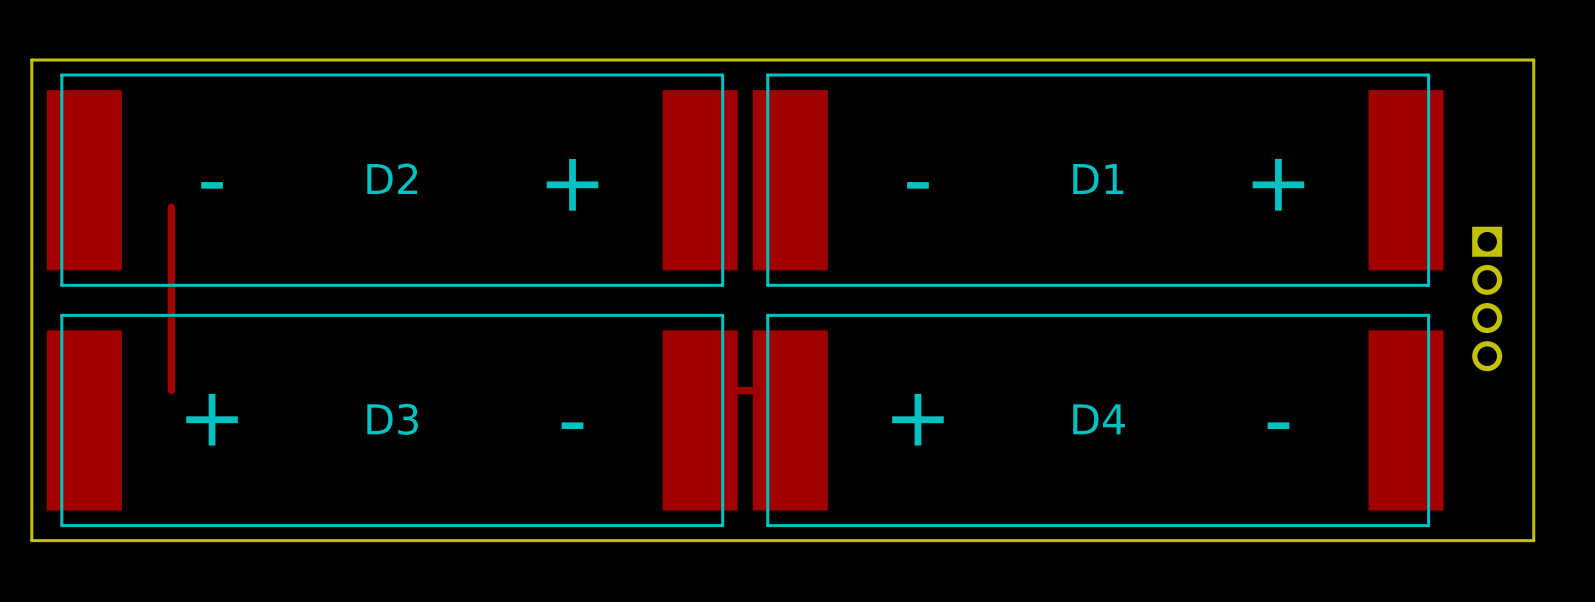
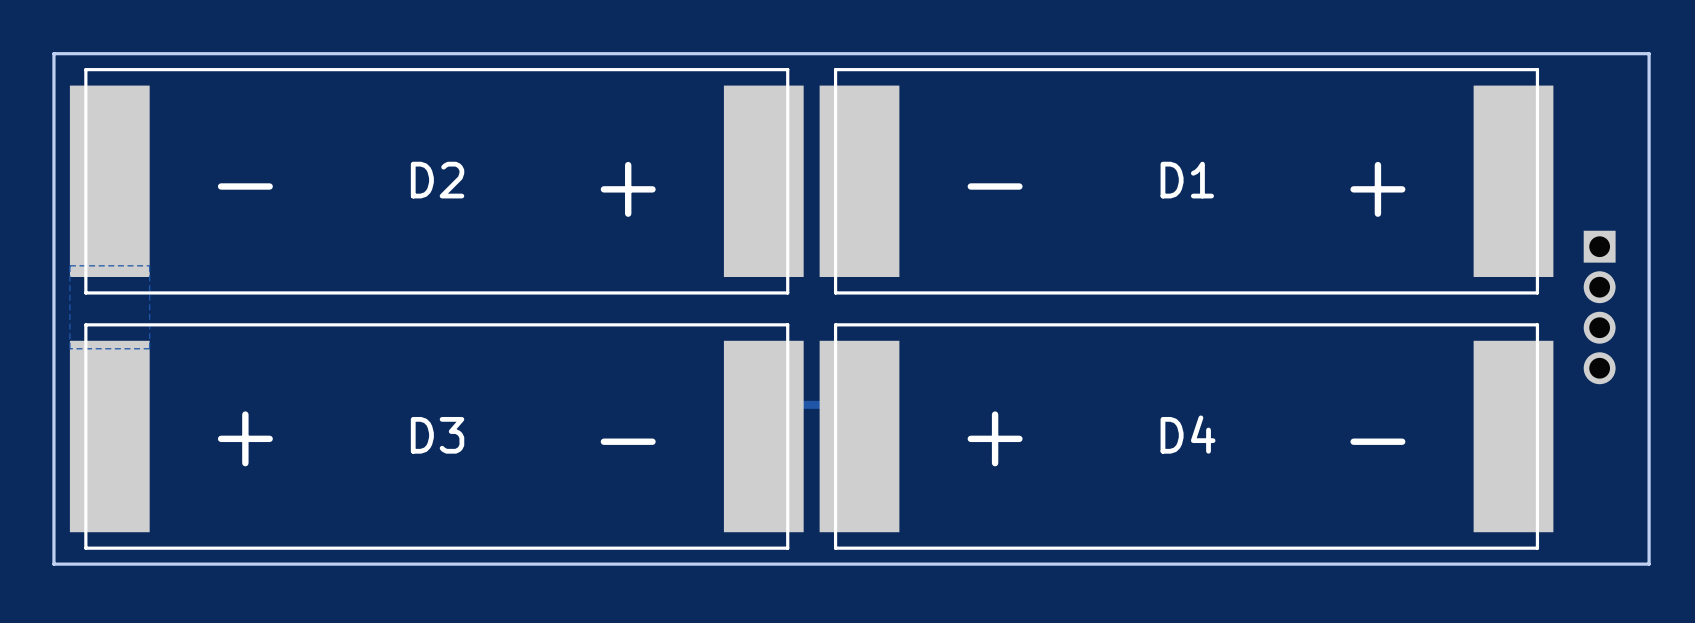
track: (171, 207) (171, 390) -> none
zone outline: none -> (69, 265) (69, 348) (149, 348) (149, 265) (69, 265)

